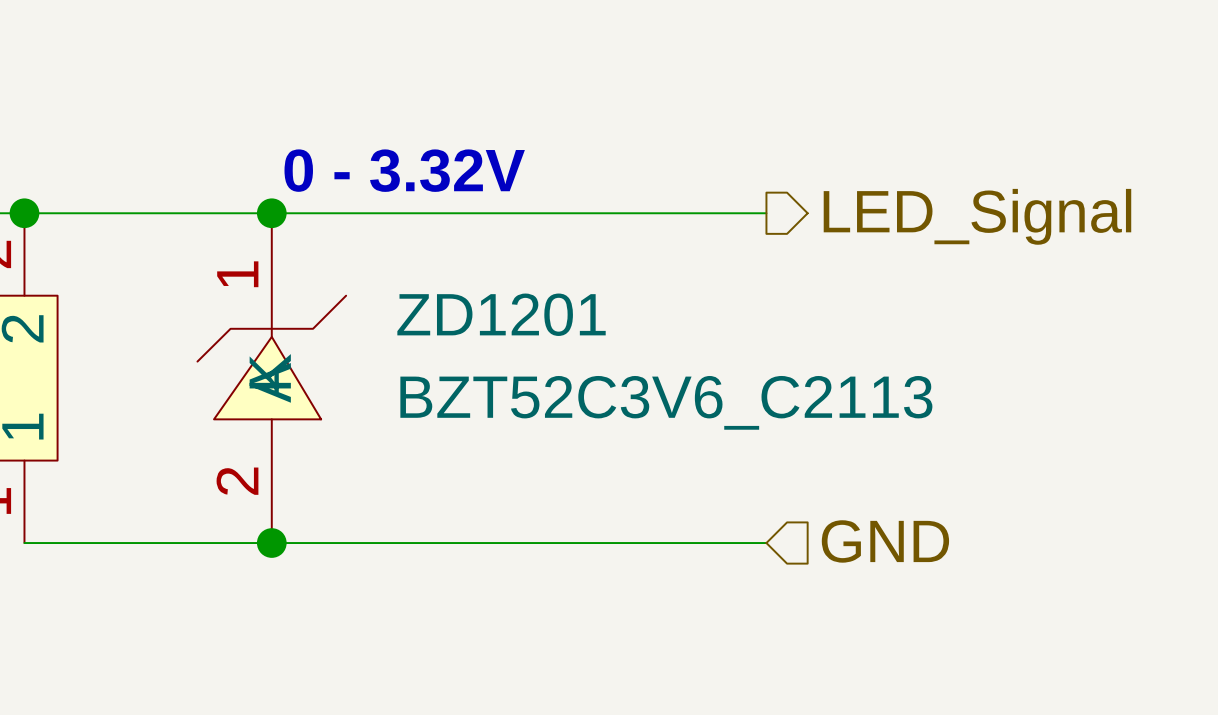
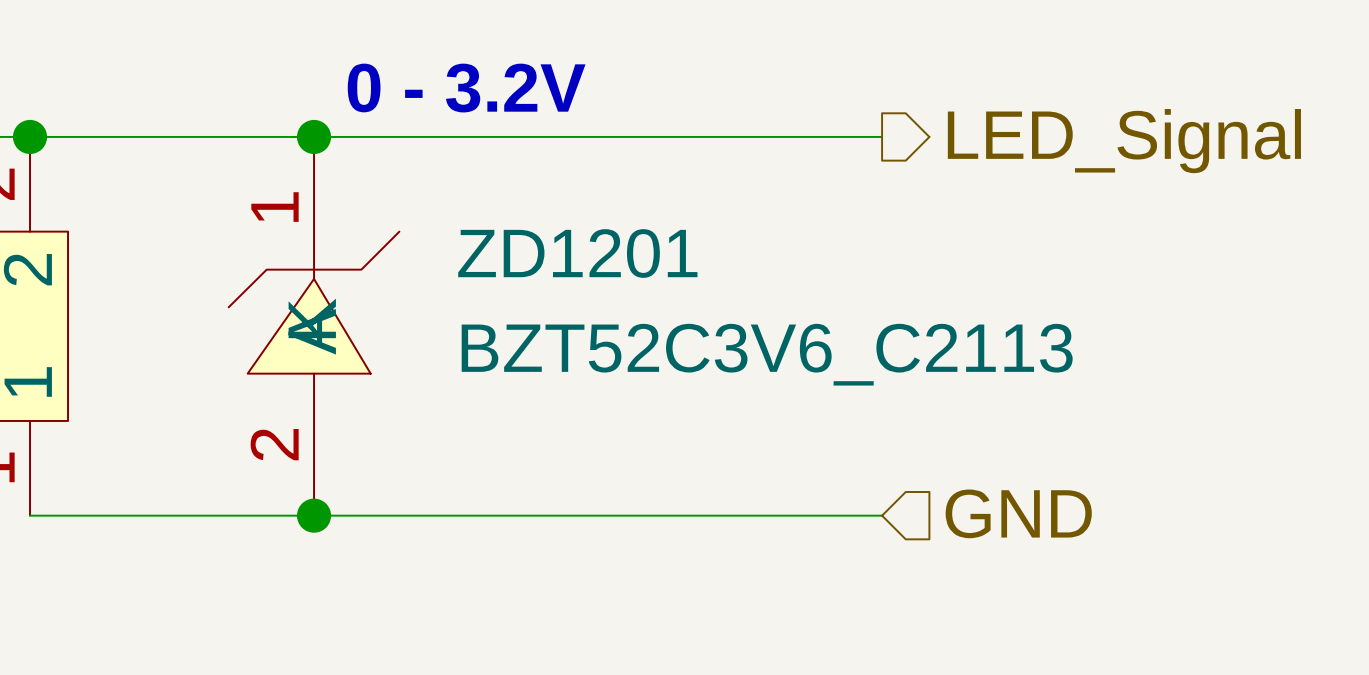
text: 0 - 3.32V (404, 170) -> 0 - 3.2V (466, 88)

